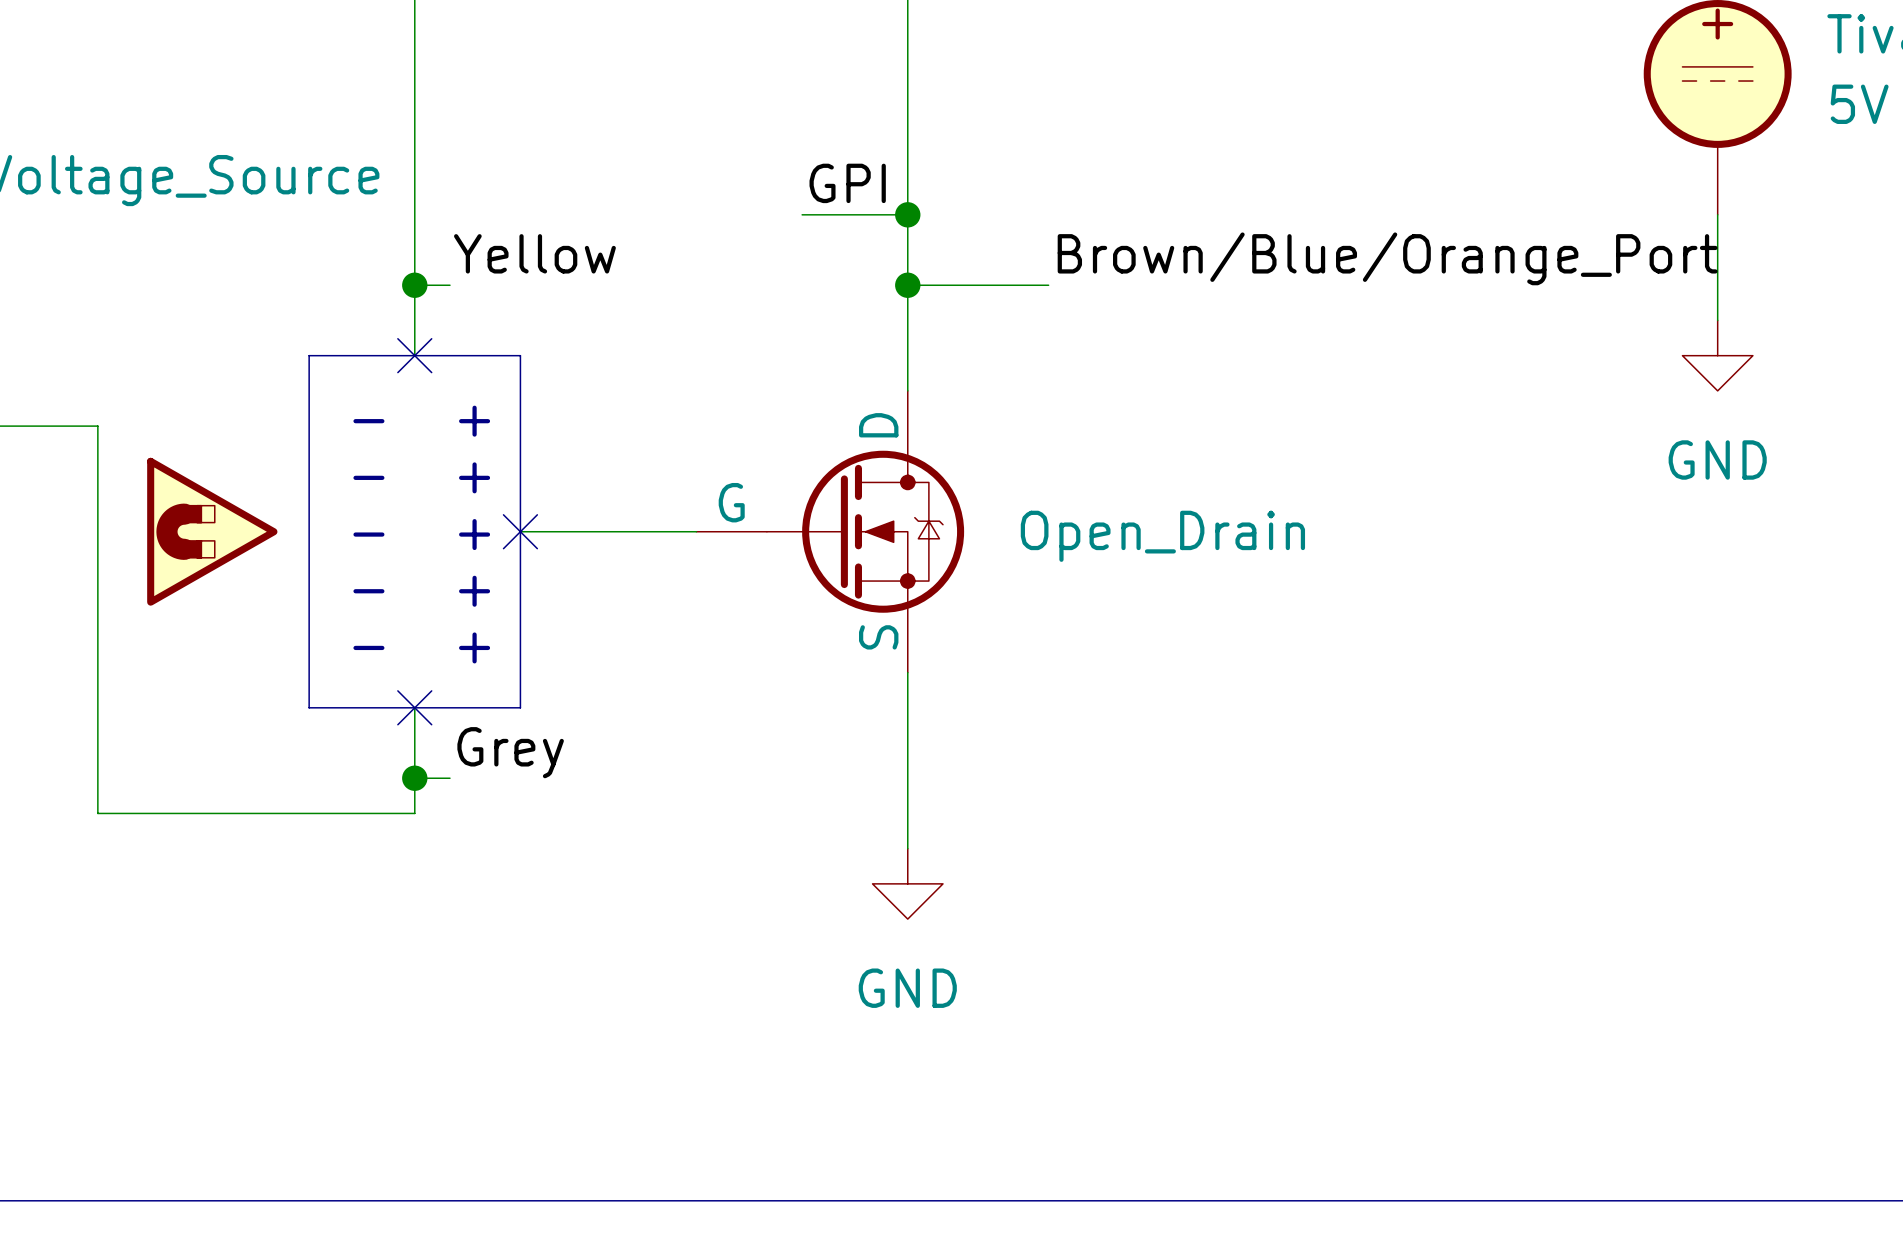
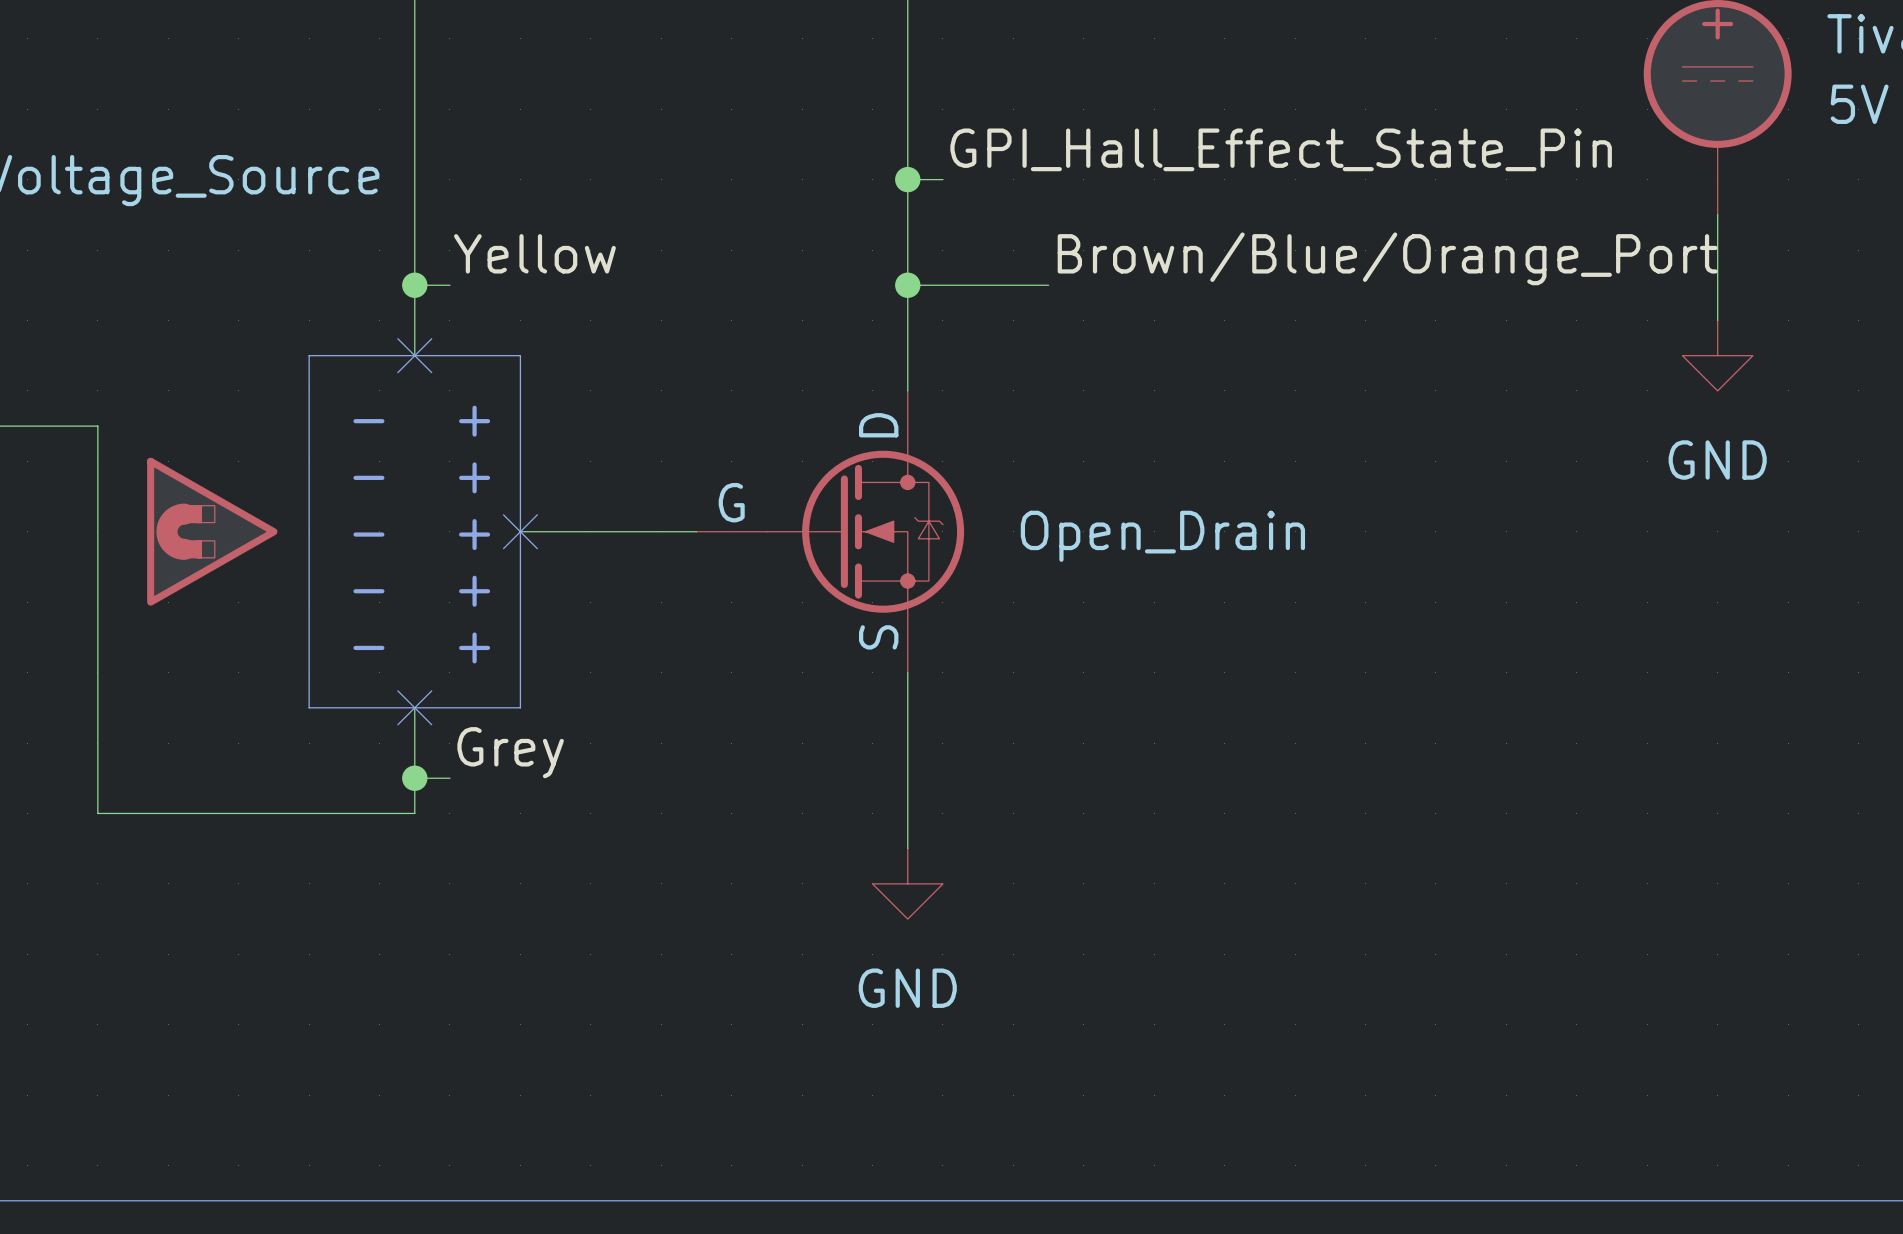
label: none -> GPI_Hall_Effect_State_Pin (1281, 149)
wire: none -> (907, 179) (942, 179)
label: GPI (847, 183) -> none
wire: (802, 214) (907, 214) -> none
junction position: (907, 214) -> (907, 179)

